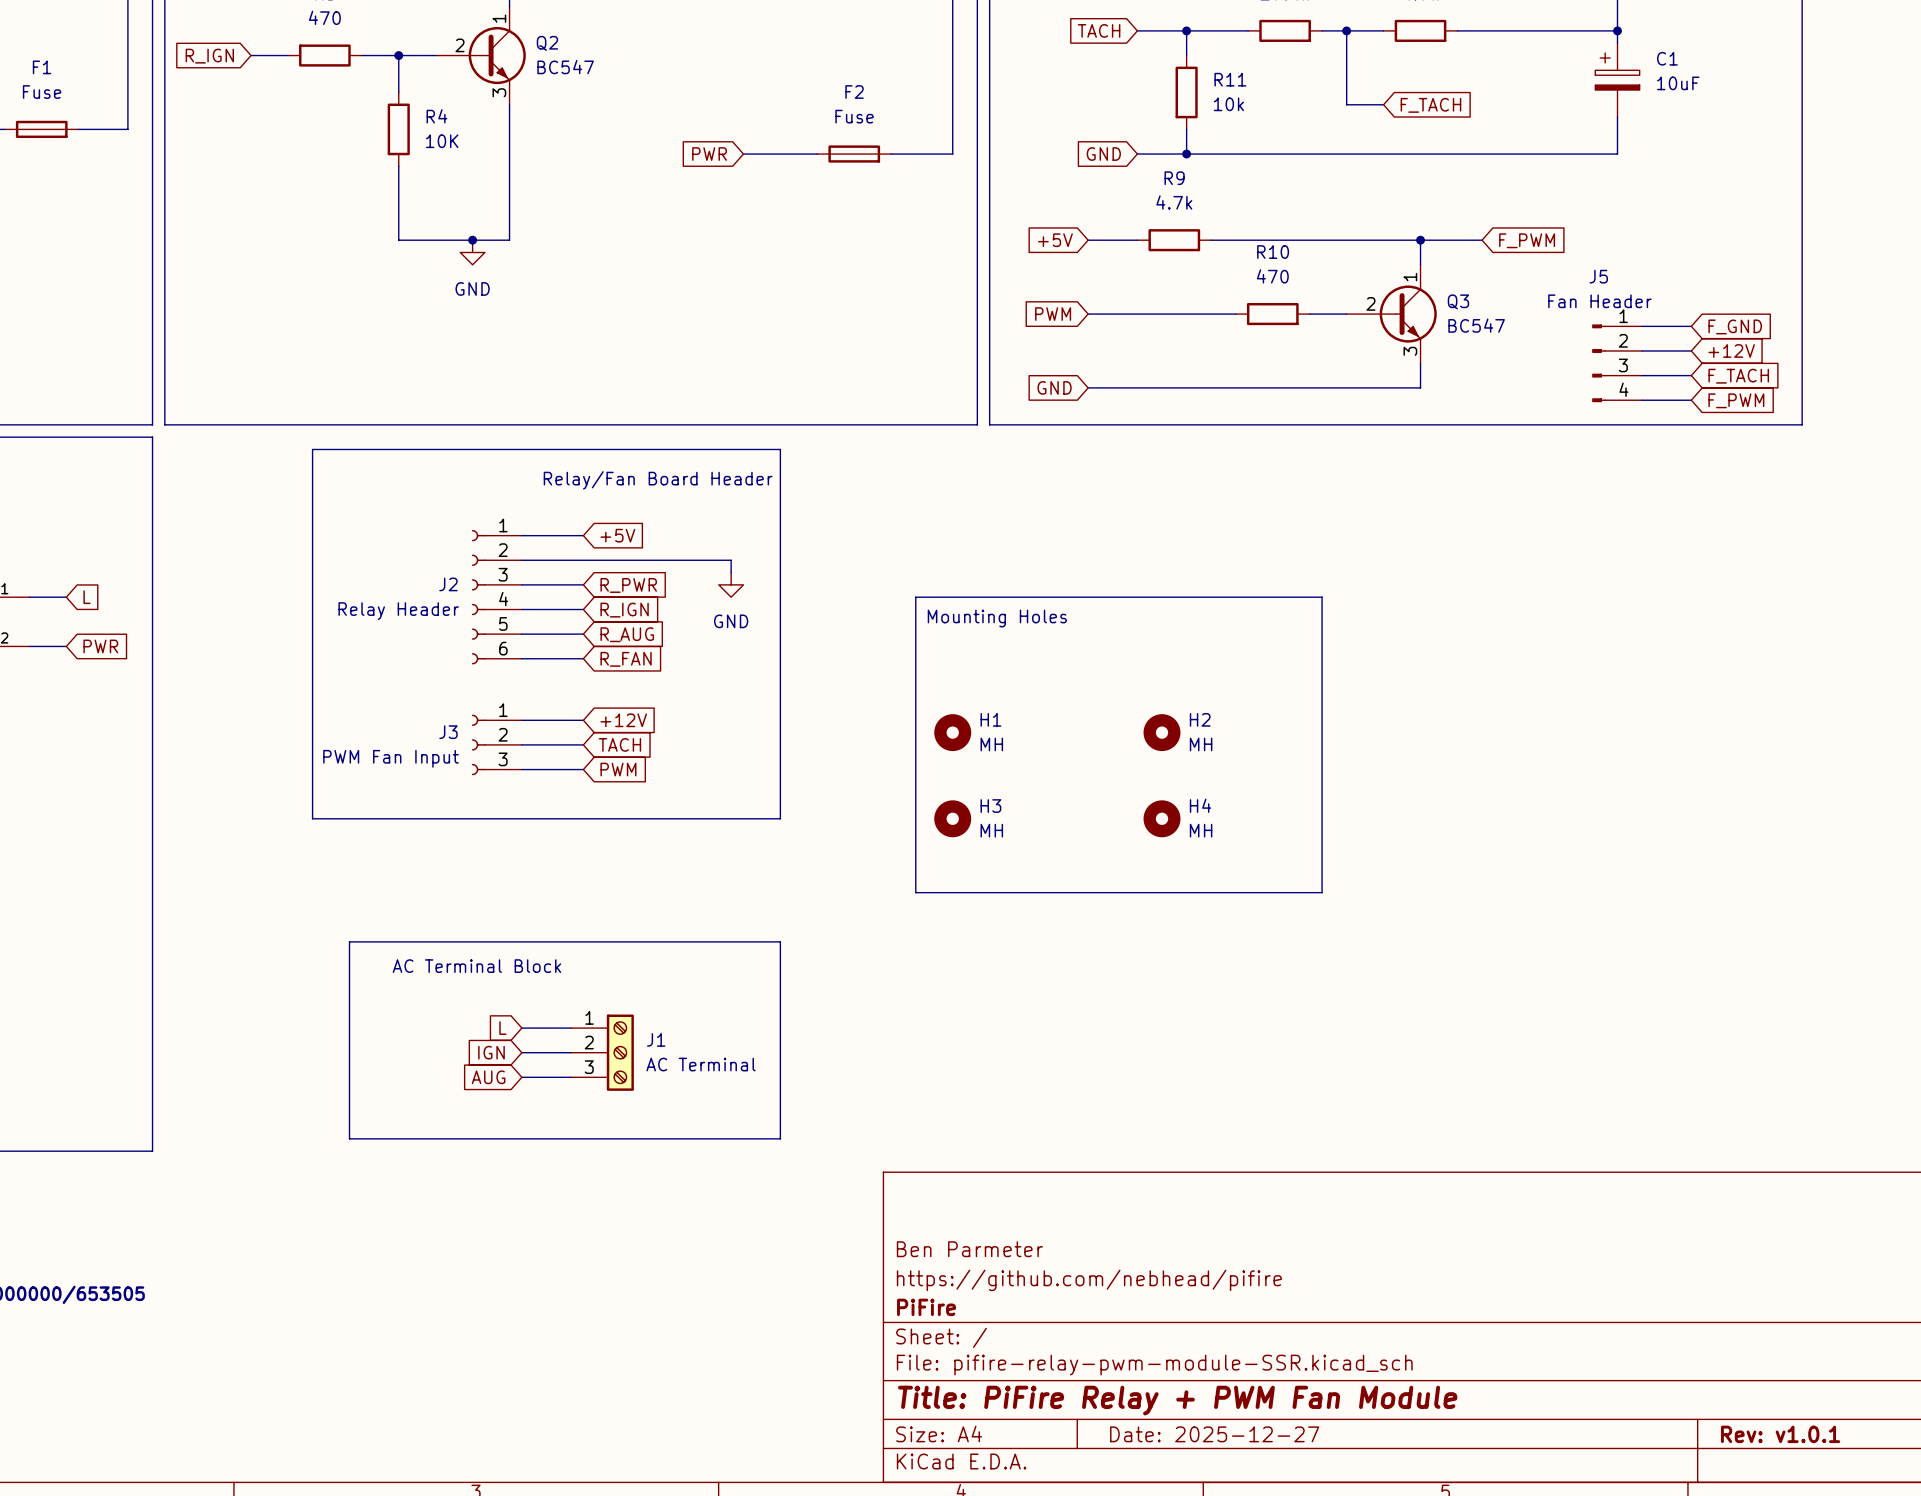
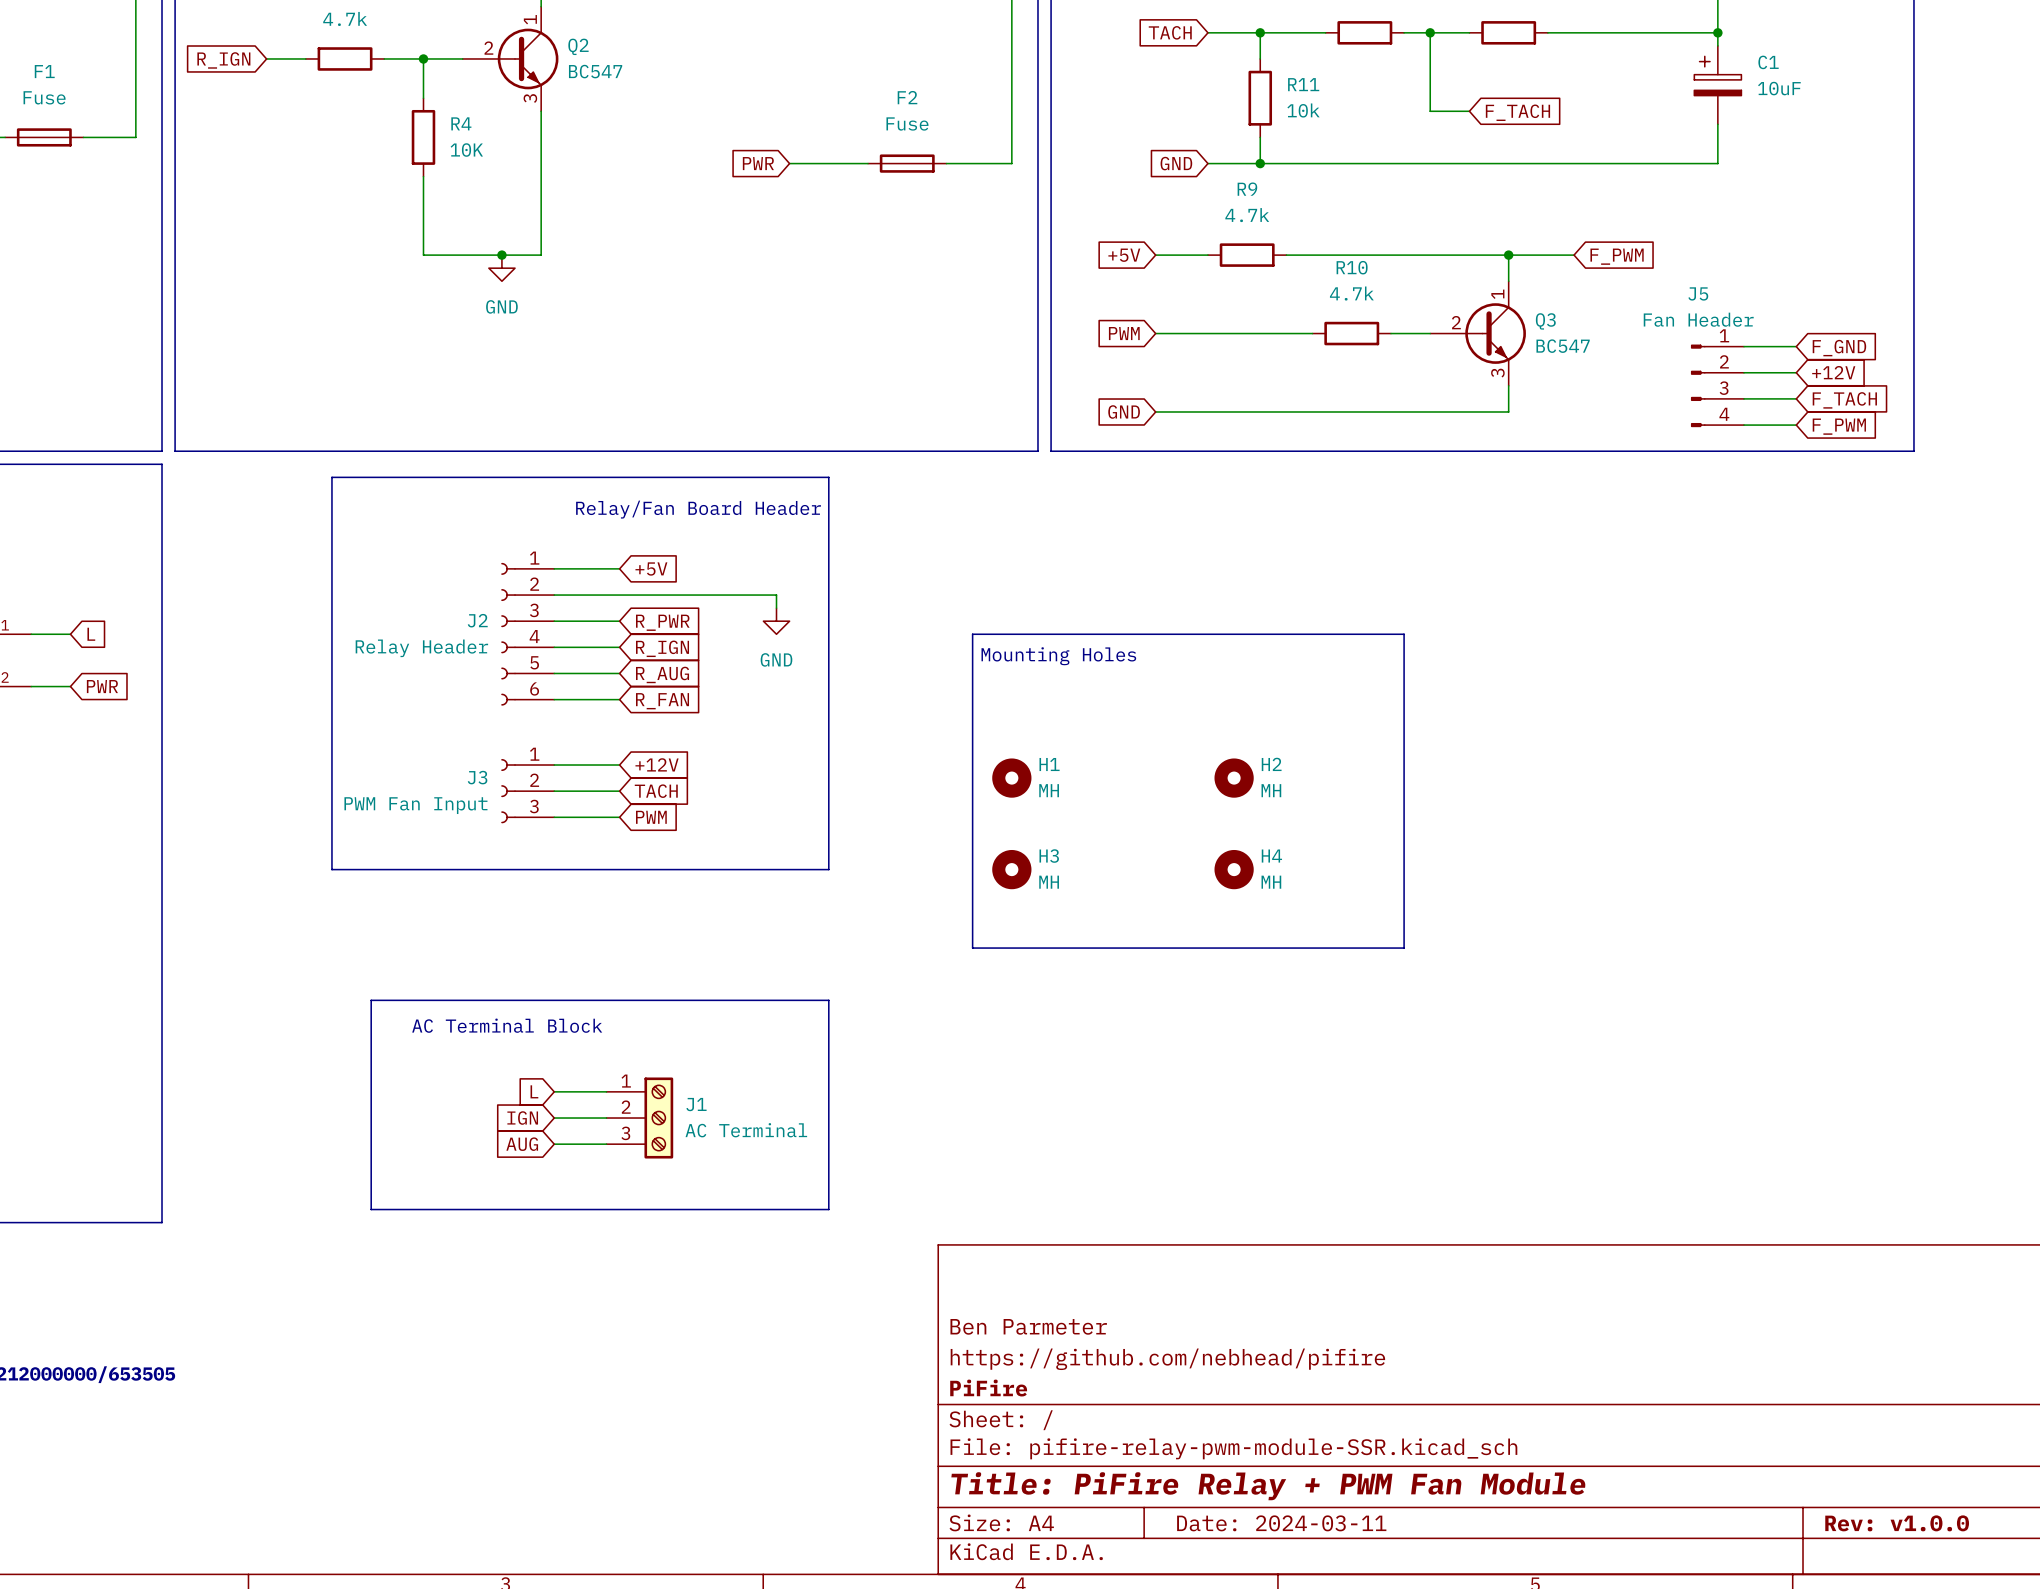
part value: 470 (324, 17) -> 4.7k (345, 18)
R10 value: 470 (1272, 276) -> 4.7k (1351, 293)
title block: Date: 2025-12-27 (1214, 1434) -> Date: 2024-03-11 (1281, 1523)
title block: Rev: v1.0.1 (1780, 1434) -> Rev: v1.0.0 (1897, 1523)

